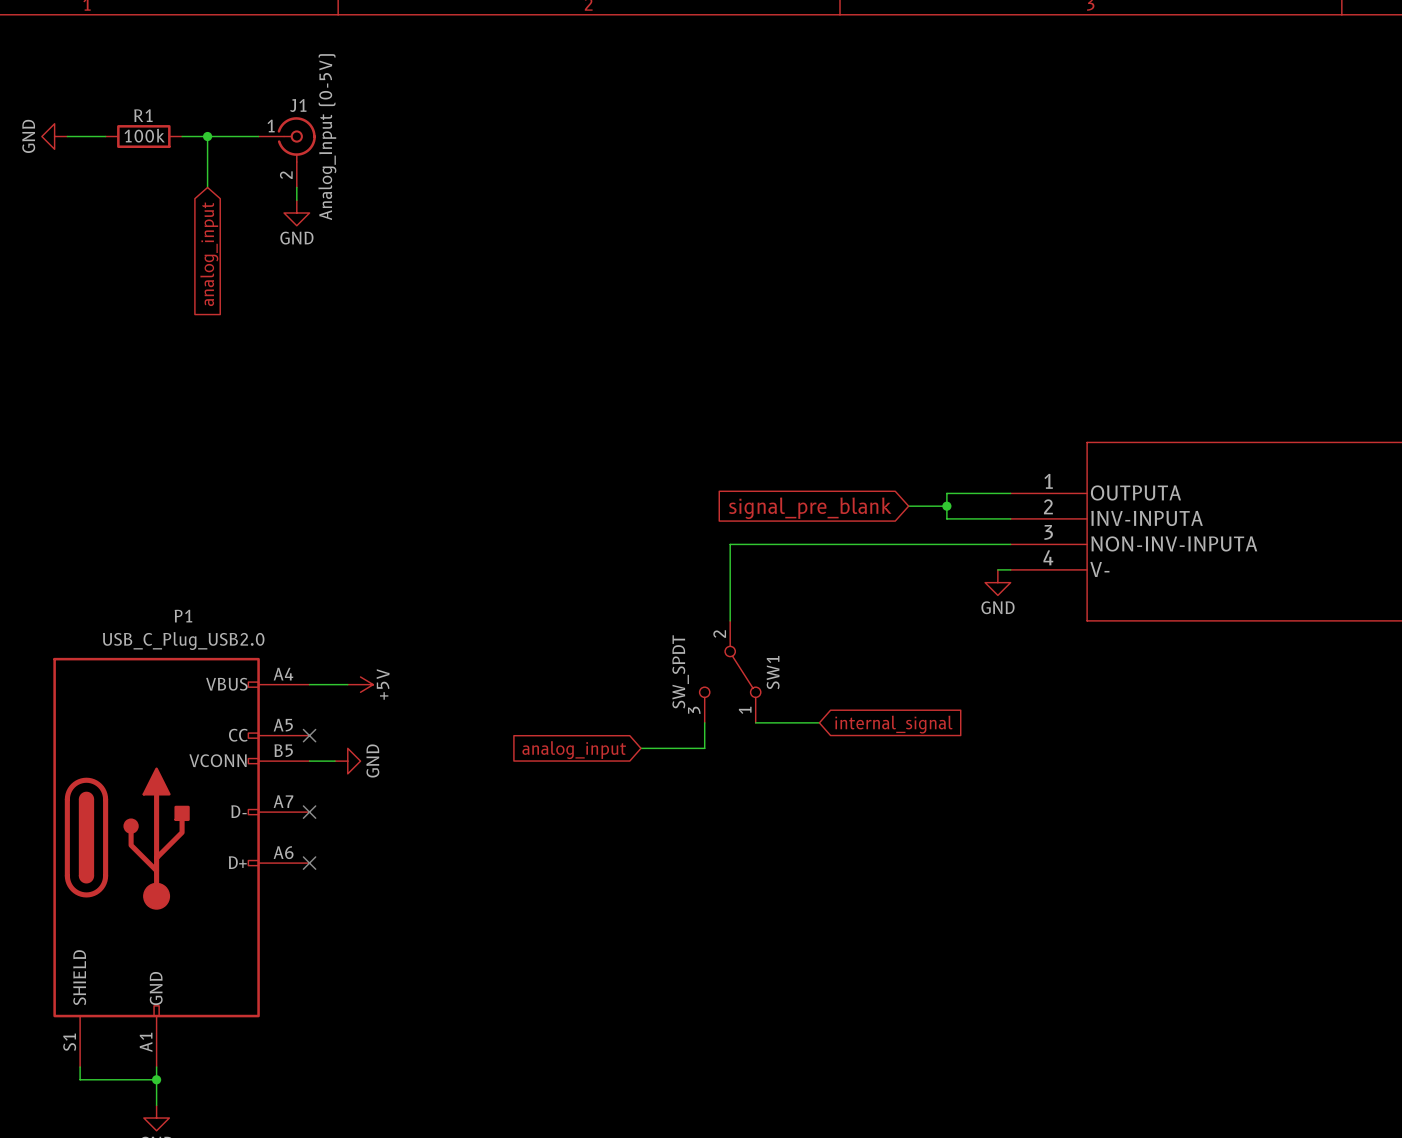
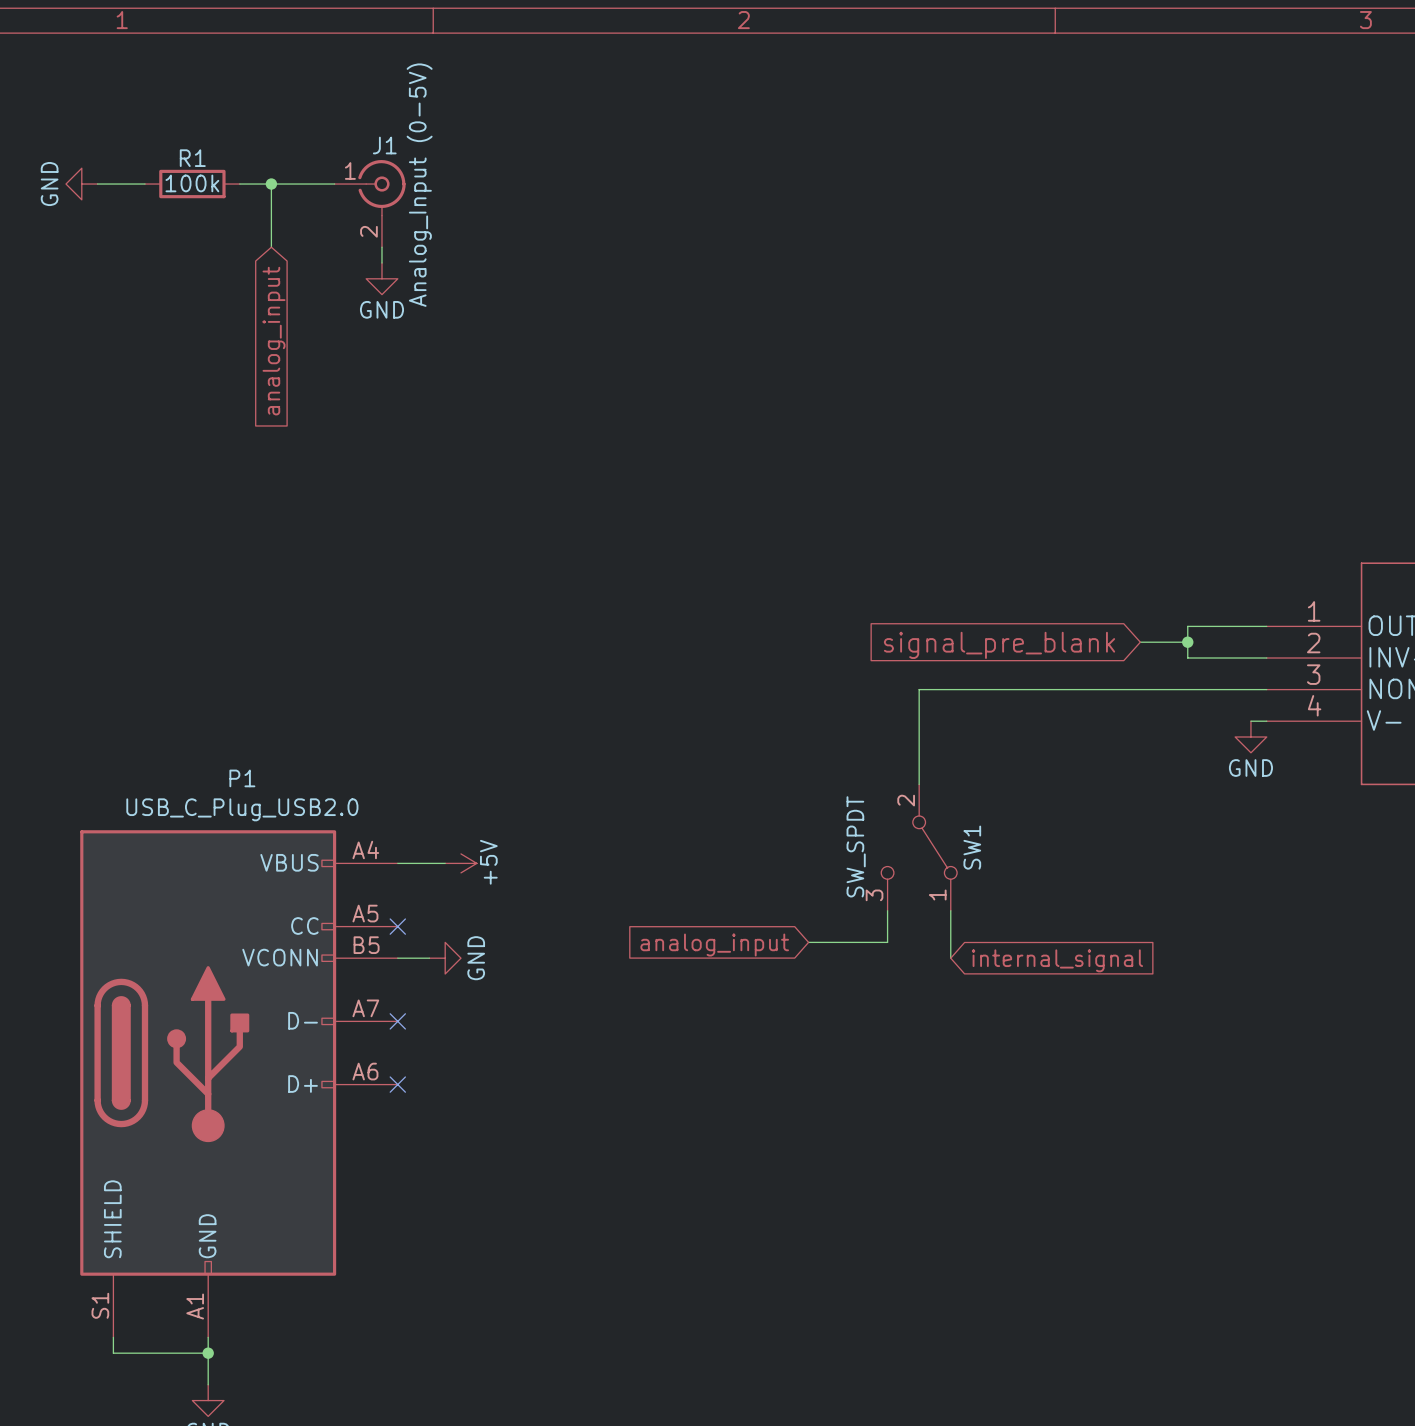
wire: (755, 722) (819, 722) -> (950, 910) (950, 958)
global label position: internal_signal (894, 724) -> internal_signal (1057, 960)

